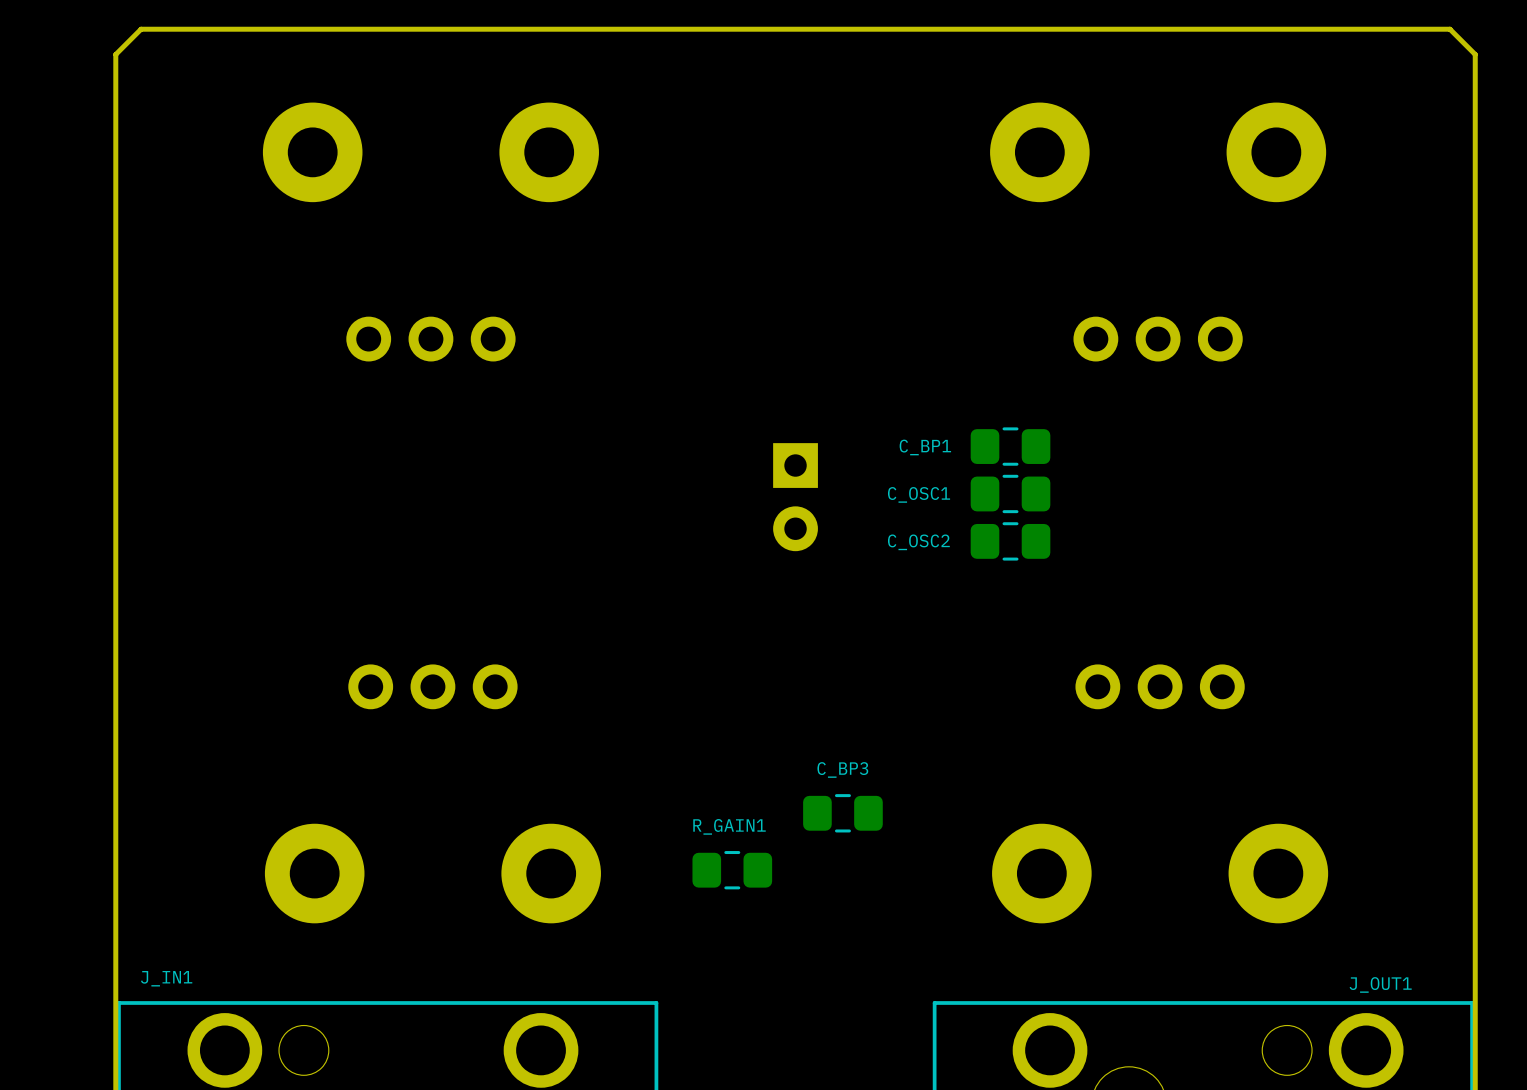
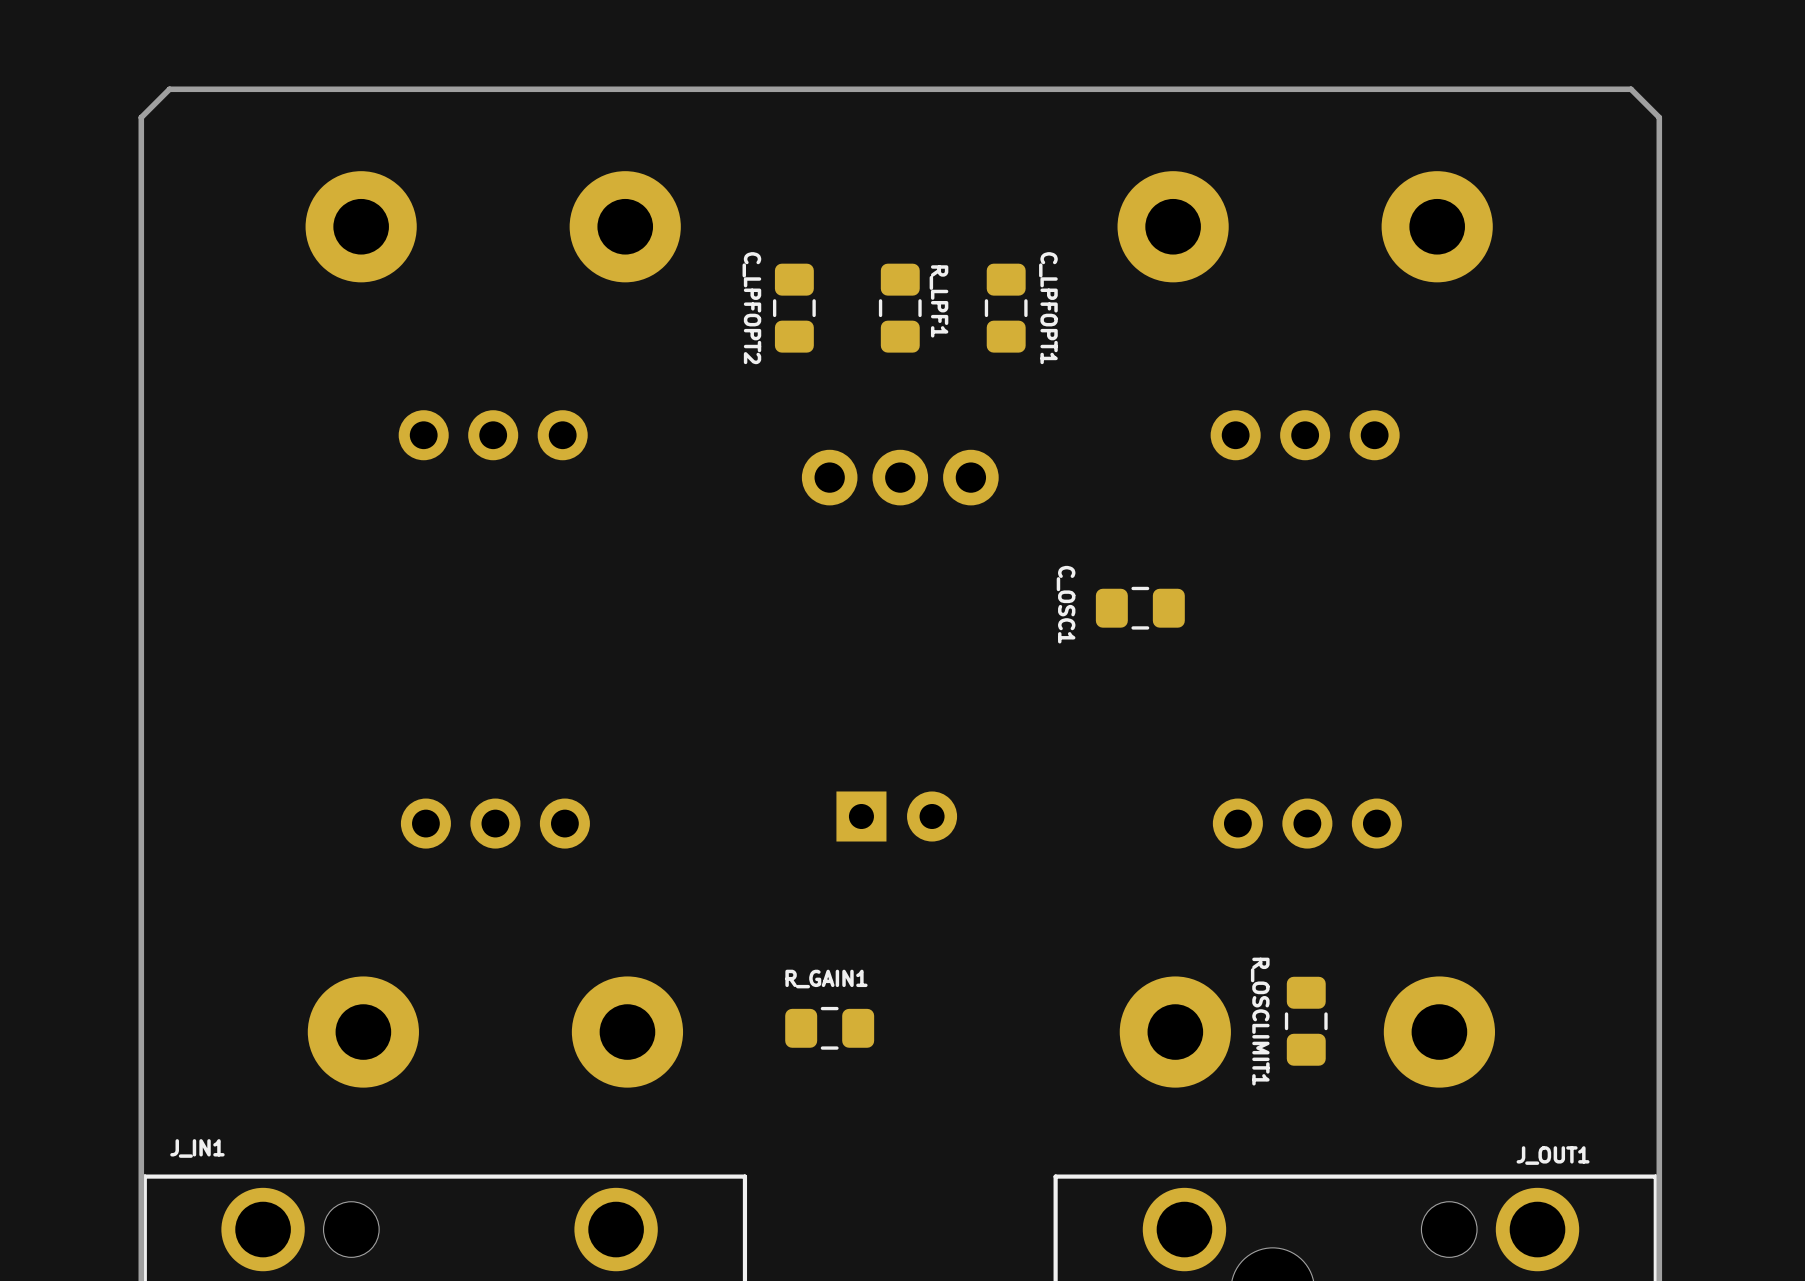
C_LPFOPT2: none -> (794, 308)
R_LPF1: none -> (900, 308)
C_LPFOPT1: none -> (1006, 308)
part: none -> (900, 477)
C_BP1: (1010, 446) -> none
C_OSC1 name rotation: 0° (919, 494) -> 90° clockwise (1066, 604)
part rotation: 0° (795, 497) -> 90° counterclockwise (896, 816)
part position: (795, 497) -> (896, 816)
C_OSC2: (1010, 541) -> none
C_BP3: (842, 813) -> none
R_OSCLIMIT1: none -> (1306, 1021)

